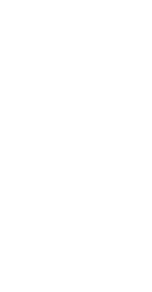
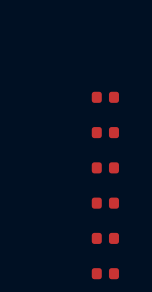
part: none -> (105, 97)
part: none -> (105, 132)
part: none -> (105, 167)
part: none -> (105, 203)
part: none -> (105, 238)
part: none -> (105, 273)

